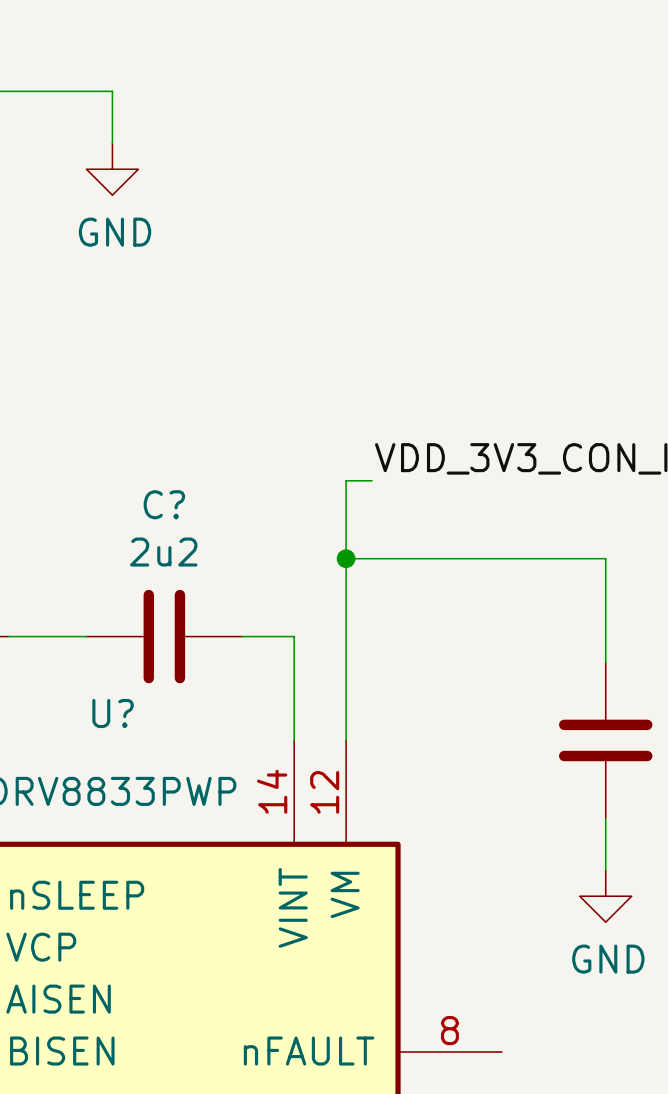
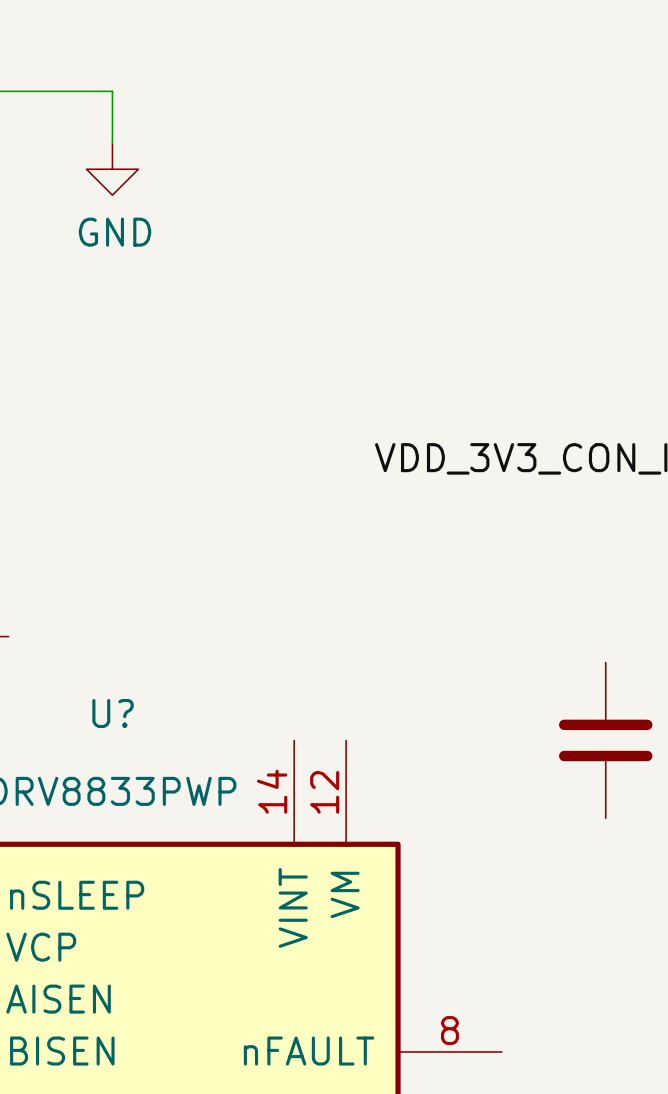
wire: (372, 480) (346, 480) (346, 740) -> none
wire: (346, 558) (605, 558) (605, 662) -> none
junction: (346, 558) -> none
wire: (8, 636) (86, 636) -> none
C?: 2u2 (164, 636) -> none
wire: (242, 636) (294, 636) (294, 740) -> none
wire: (605, 818) (605, 870) -> none
power symbol: GND (605, 896) -> none

